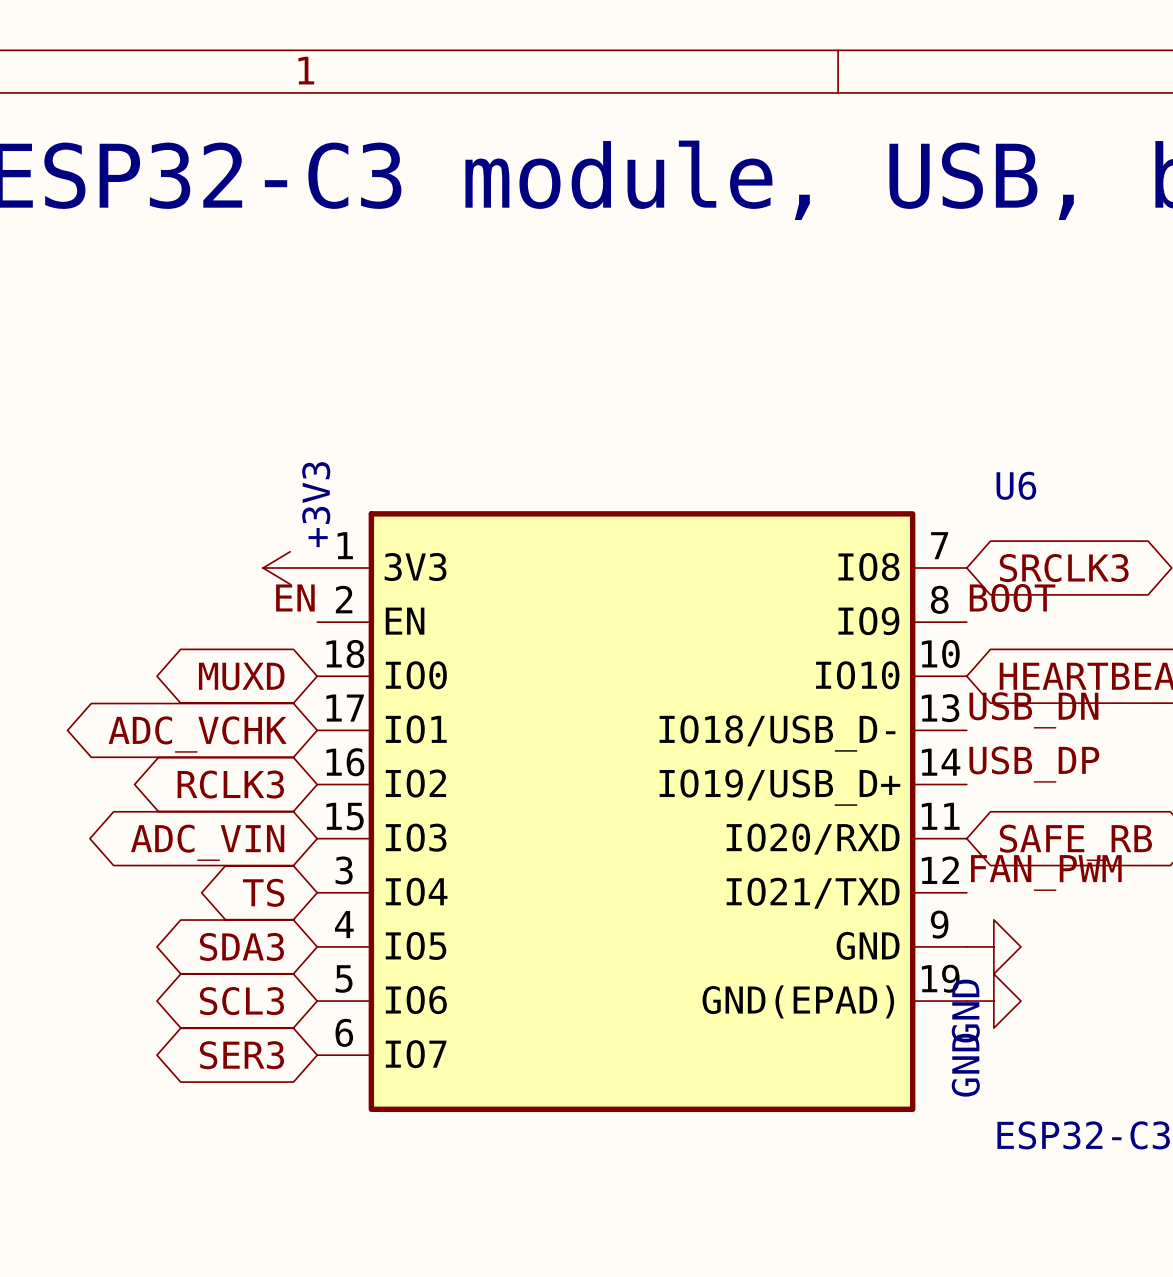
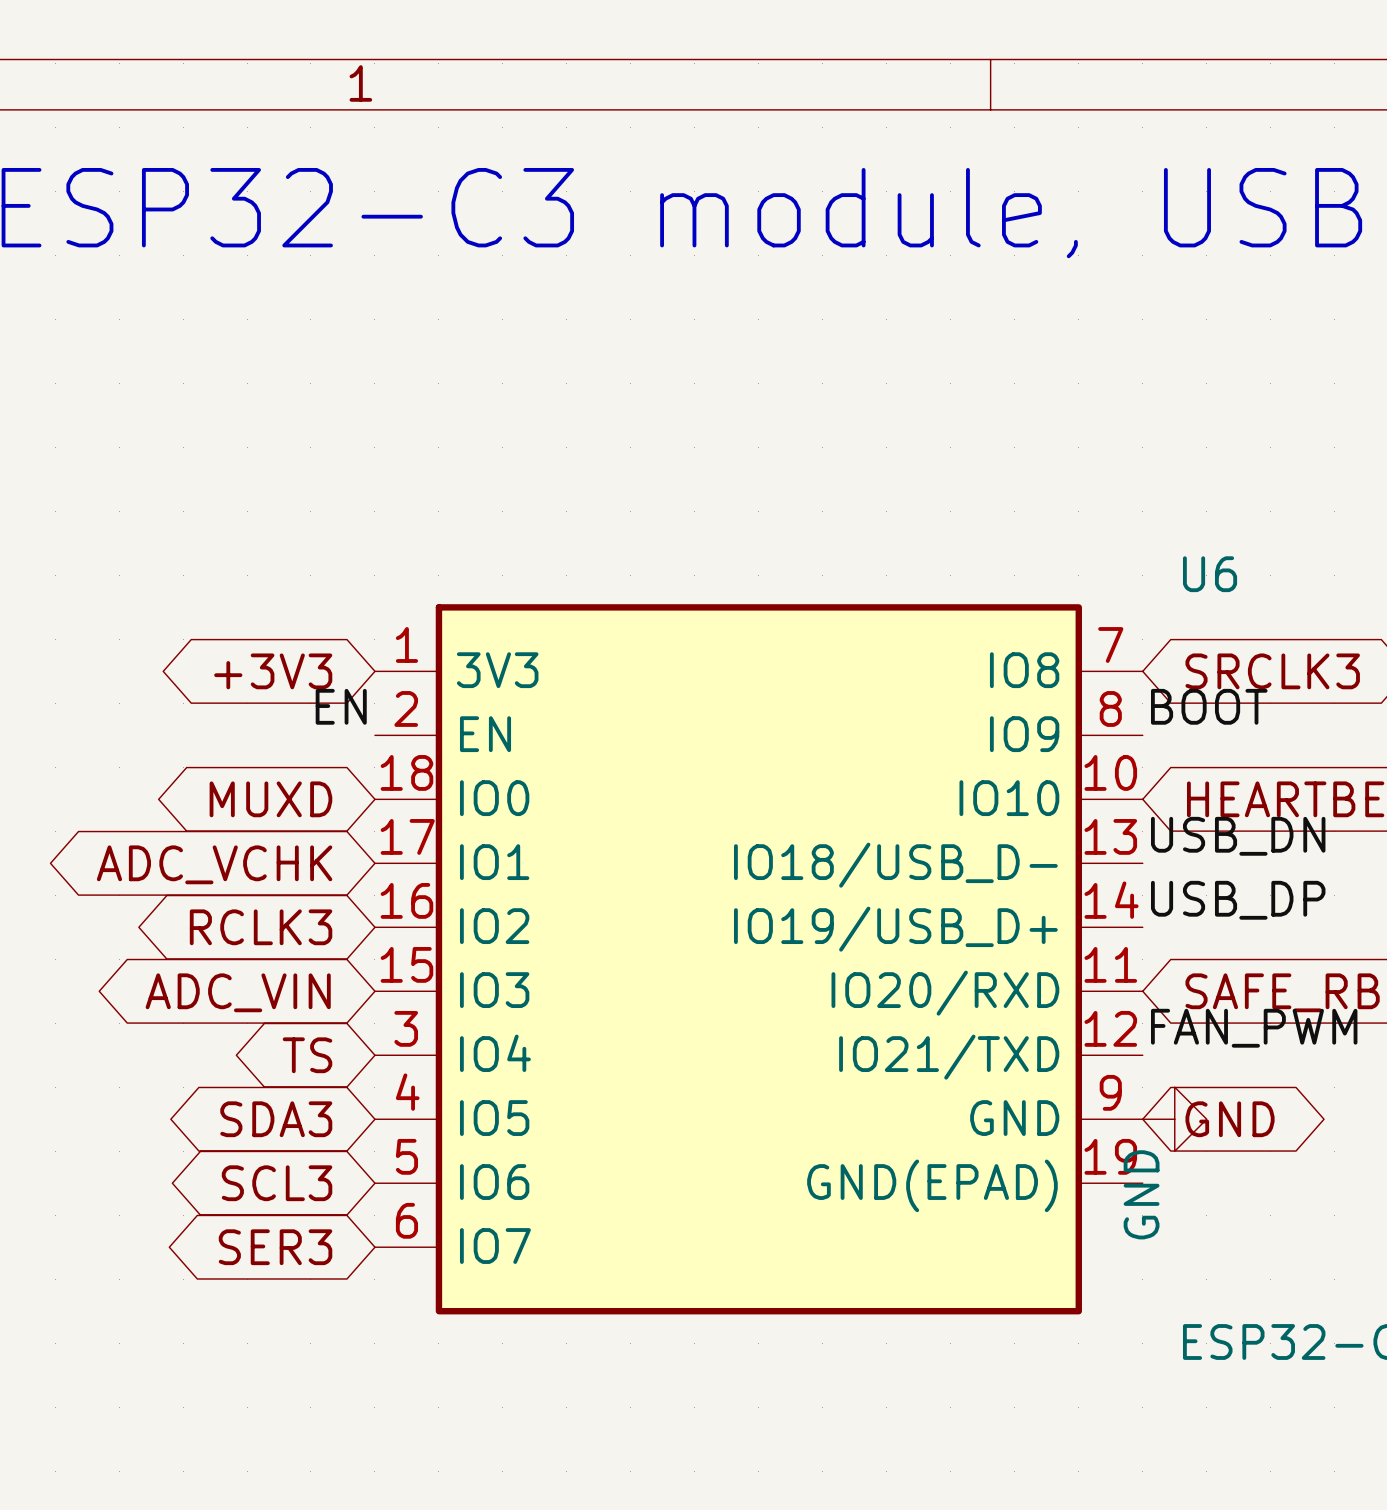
global label: none -> +3V3 (273, 671)
power symbol: +3V3 (290, 568) -> none
global label: none -> GND (1230, 1119)
power symbol: GND (993, 1001) -> none

